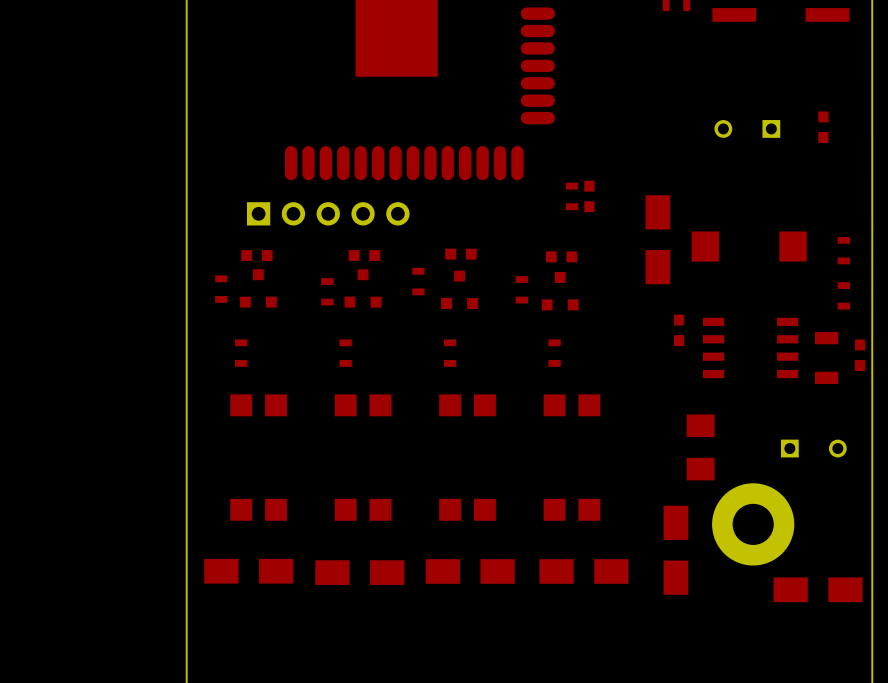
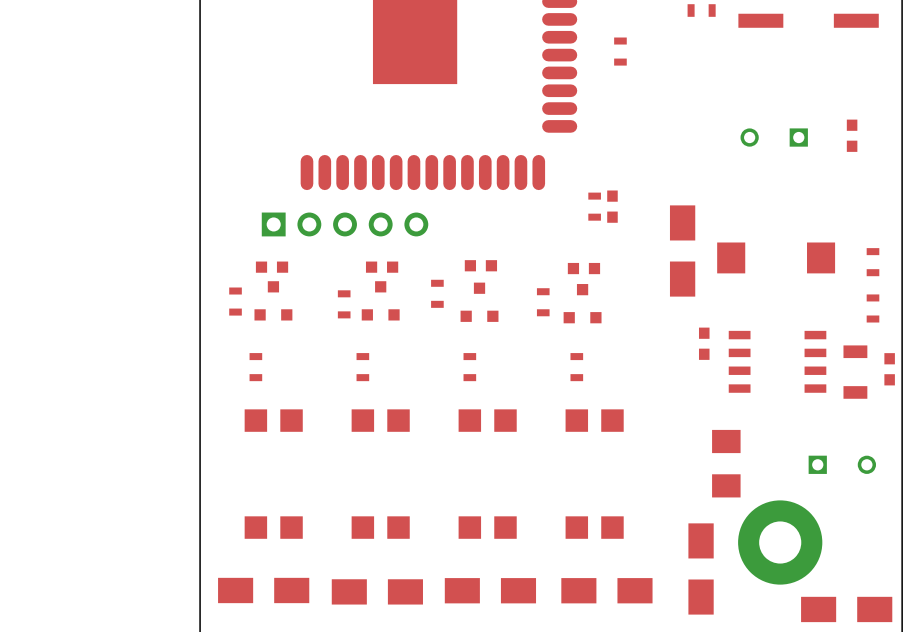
part: none -> (620, 51)

